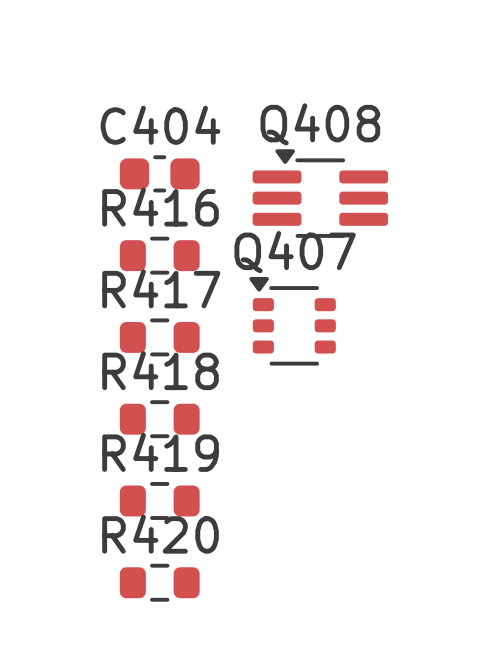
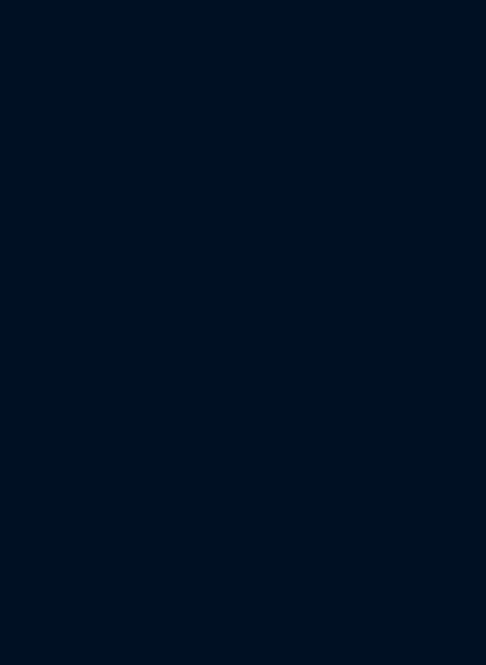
C404: (159, 173) -> none
Q408: (320, 193) -> none
R416: (159, 255) -> none
Q407: (292, 321) -> none
R417: (159, 337) -> none
R418: (159, 419) -> none
R419: (159, 500) -> none
R420: (159, 582) -> none

